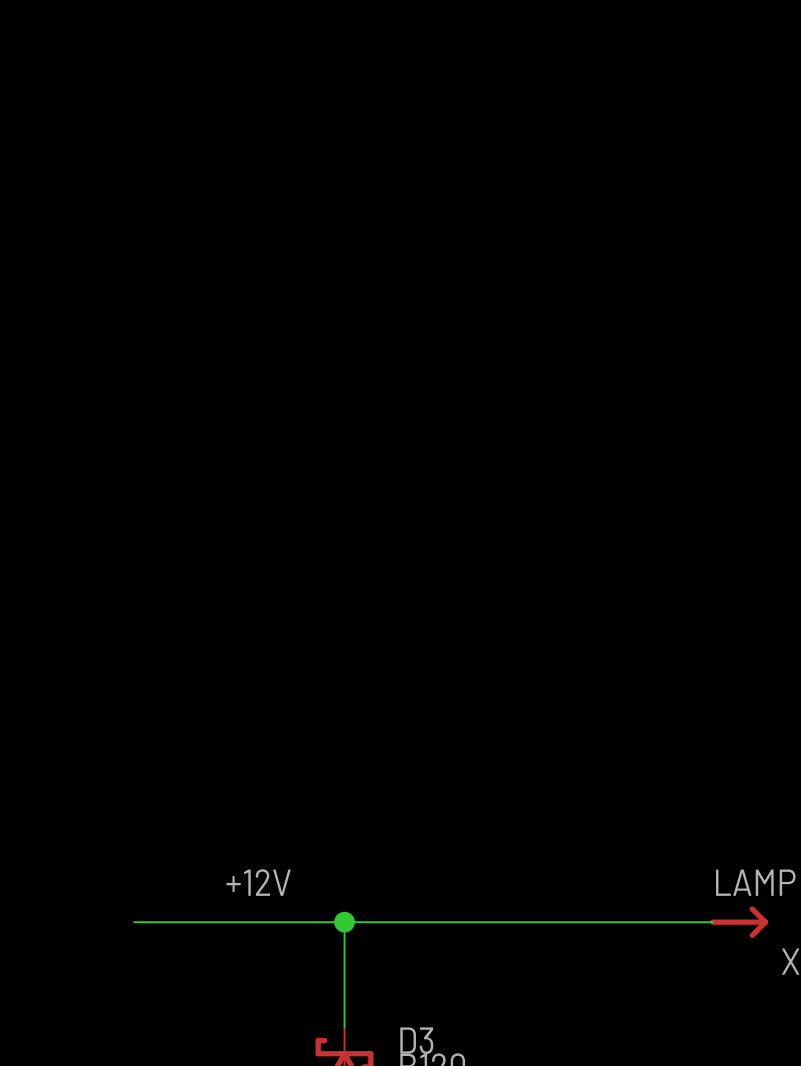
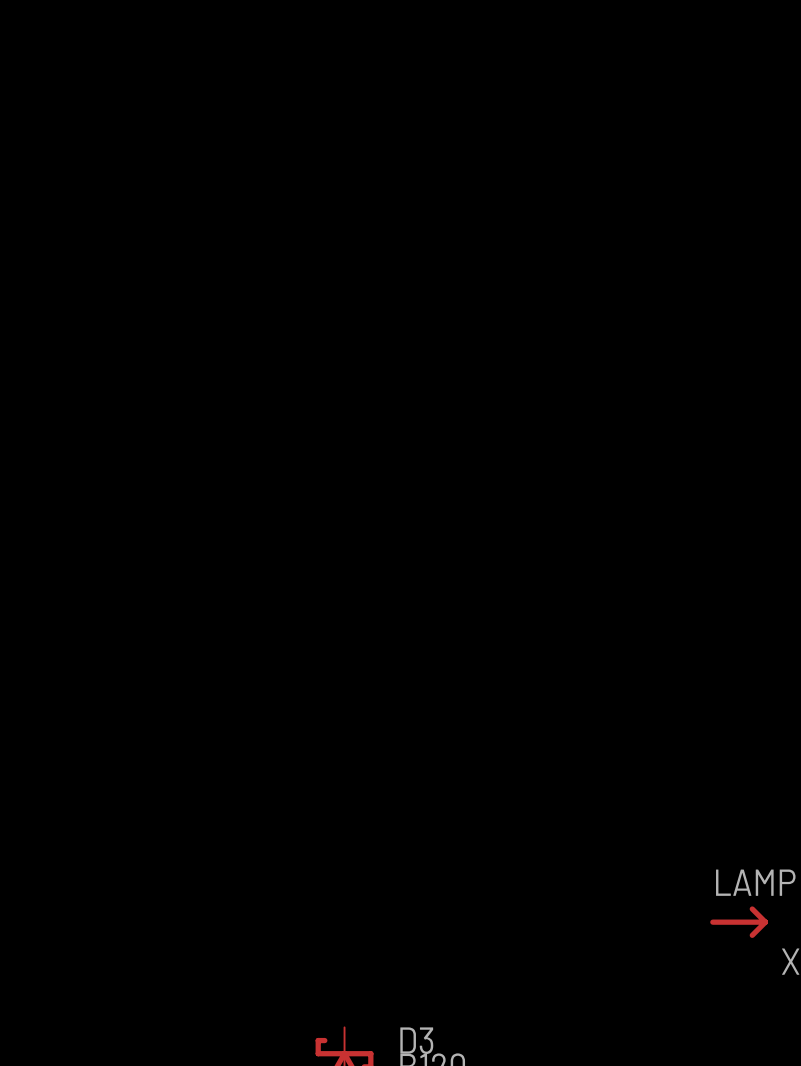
label: +12V (258, 882) -> none
wire: (134, 922) (712, 922) -> none
wire: (344, 922) (344, 1027) -> none
junction: (344, 922) -> none

